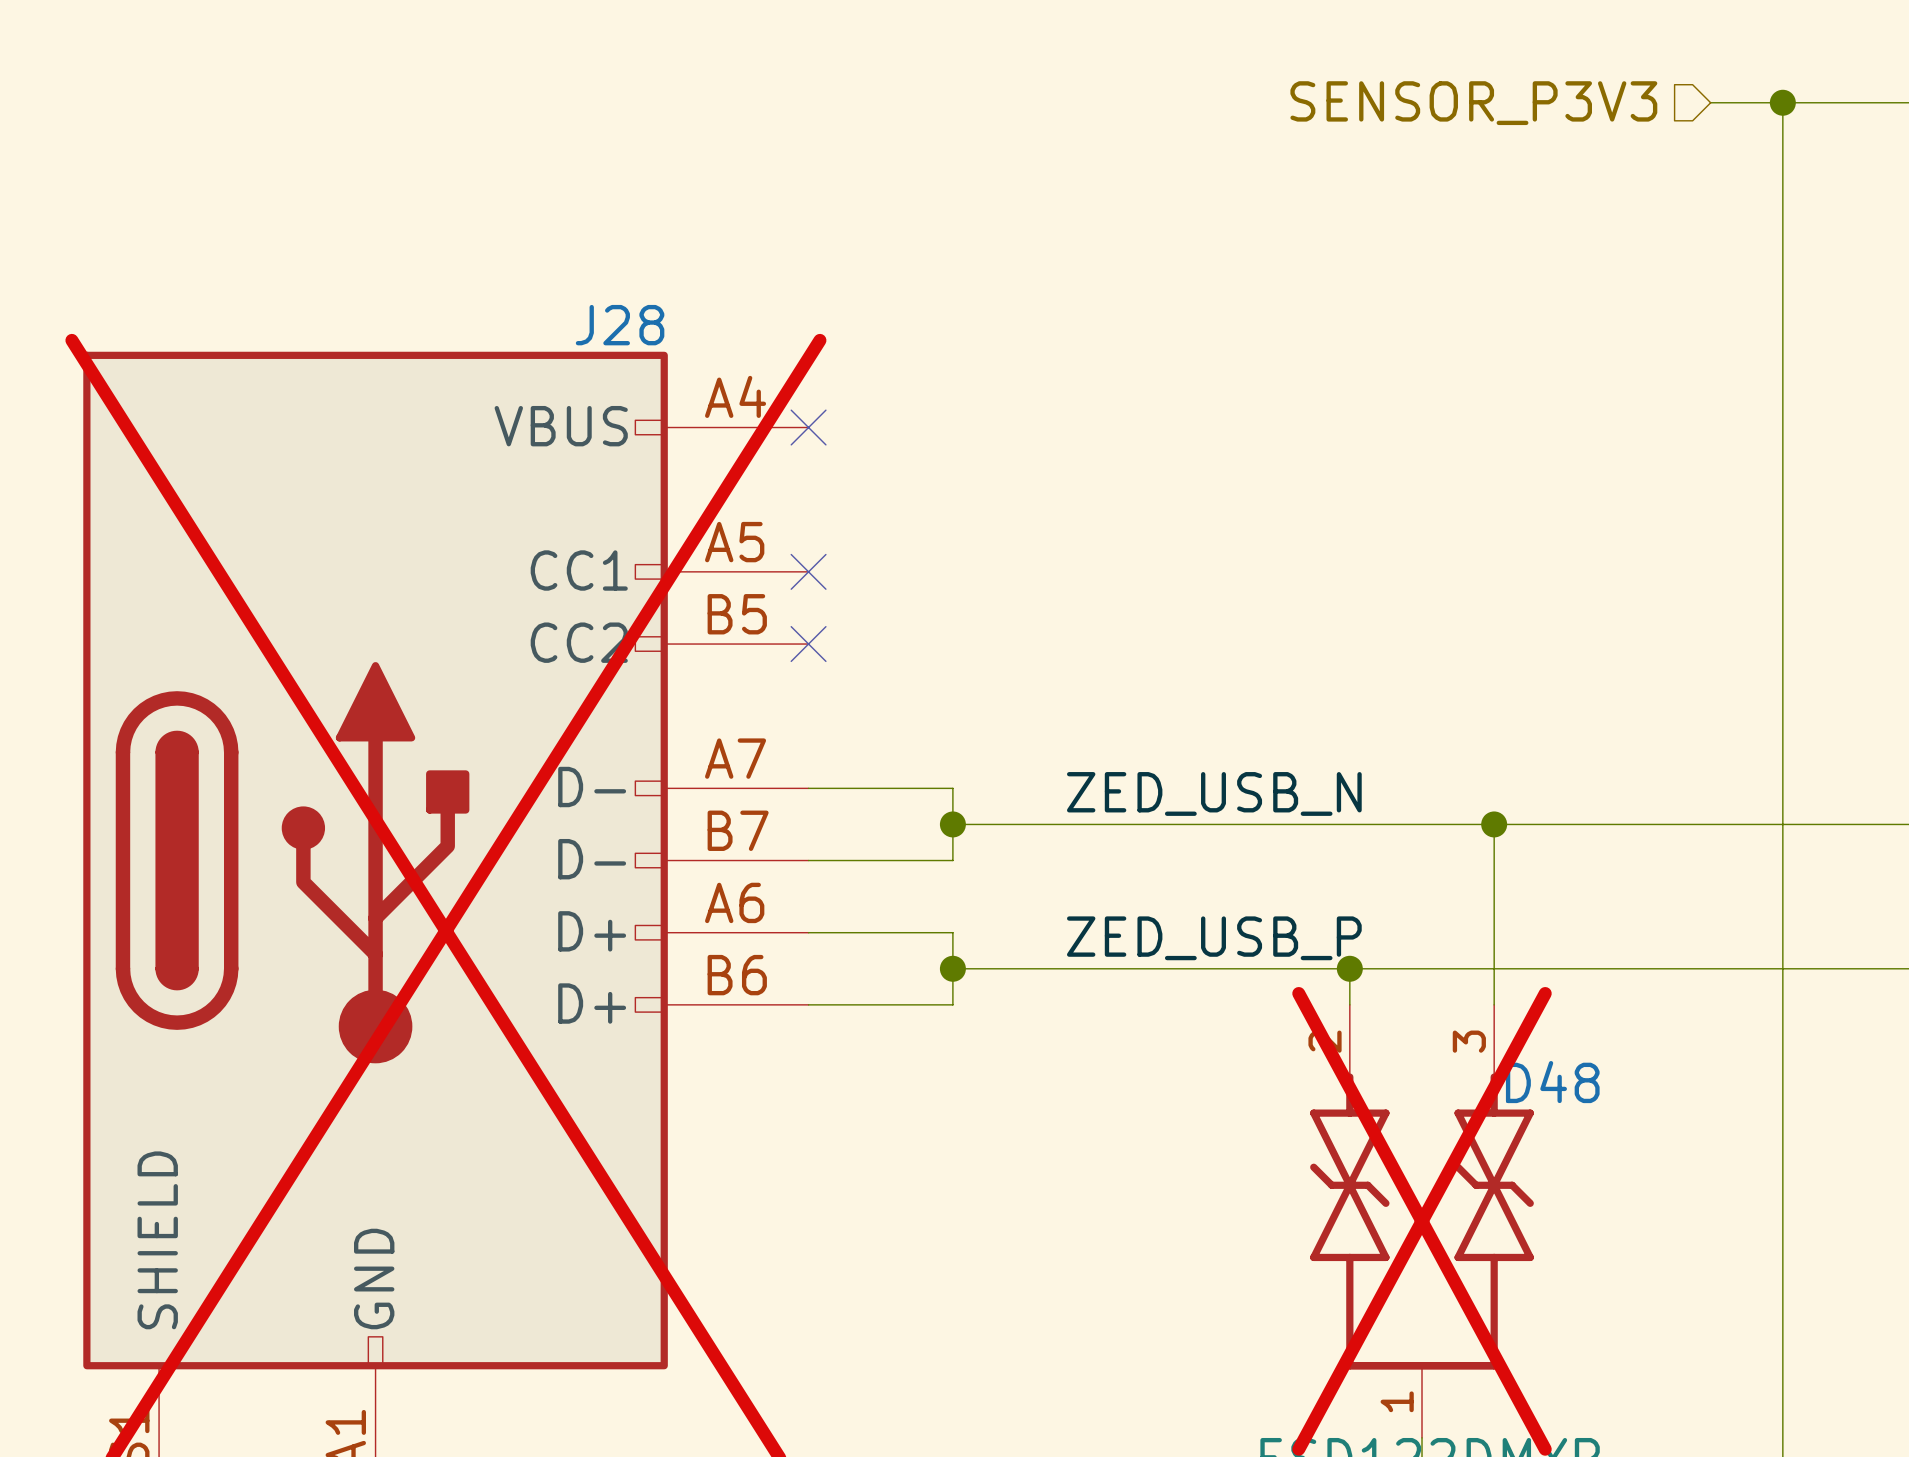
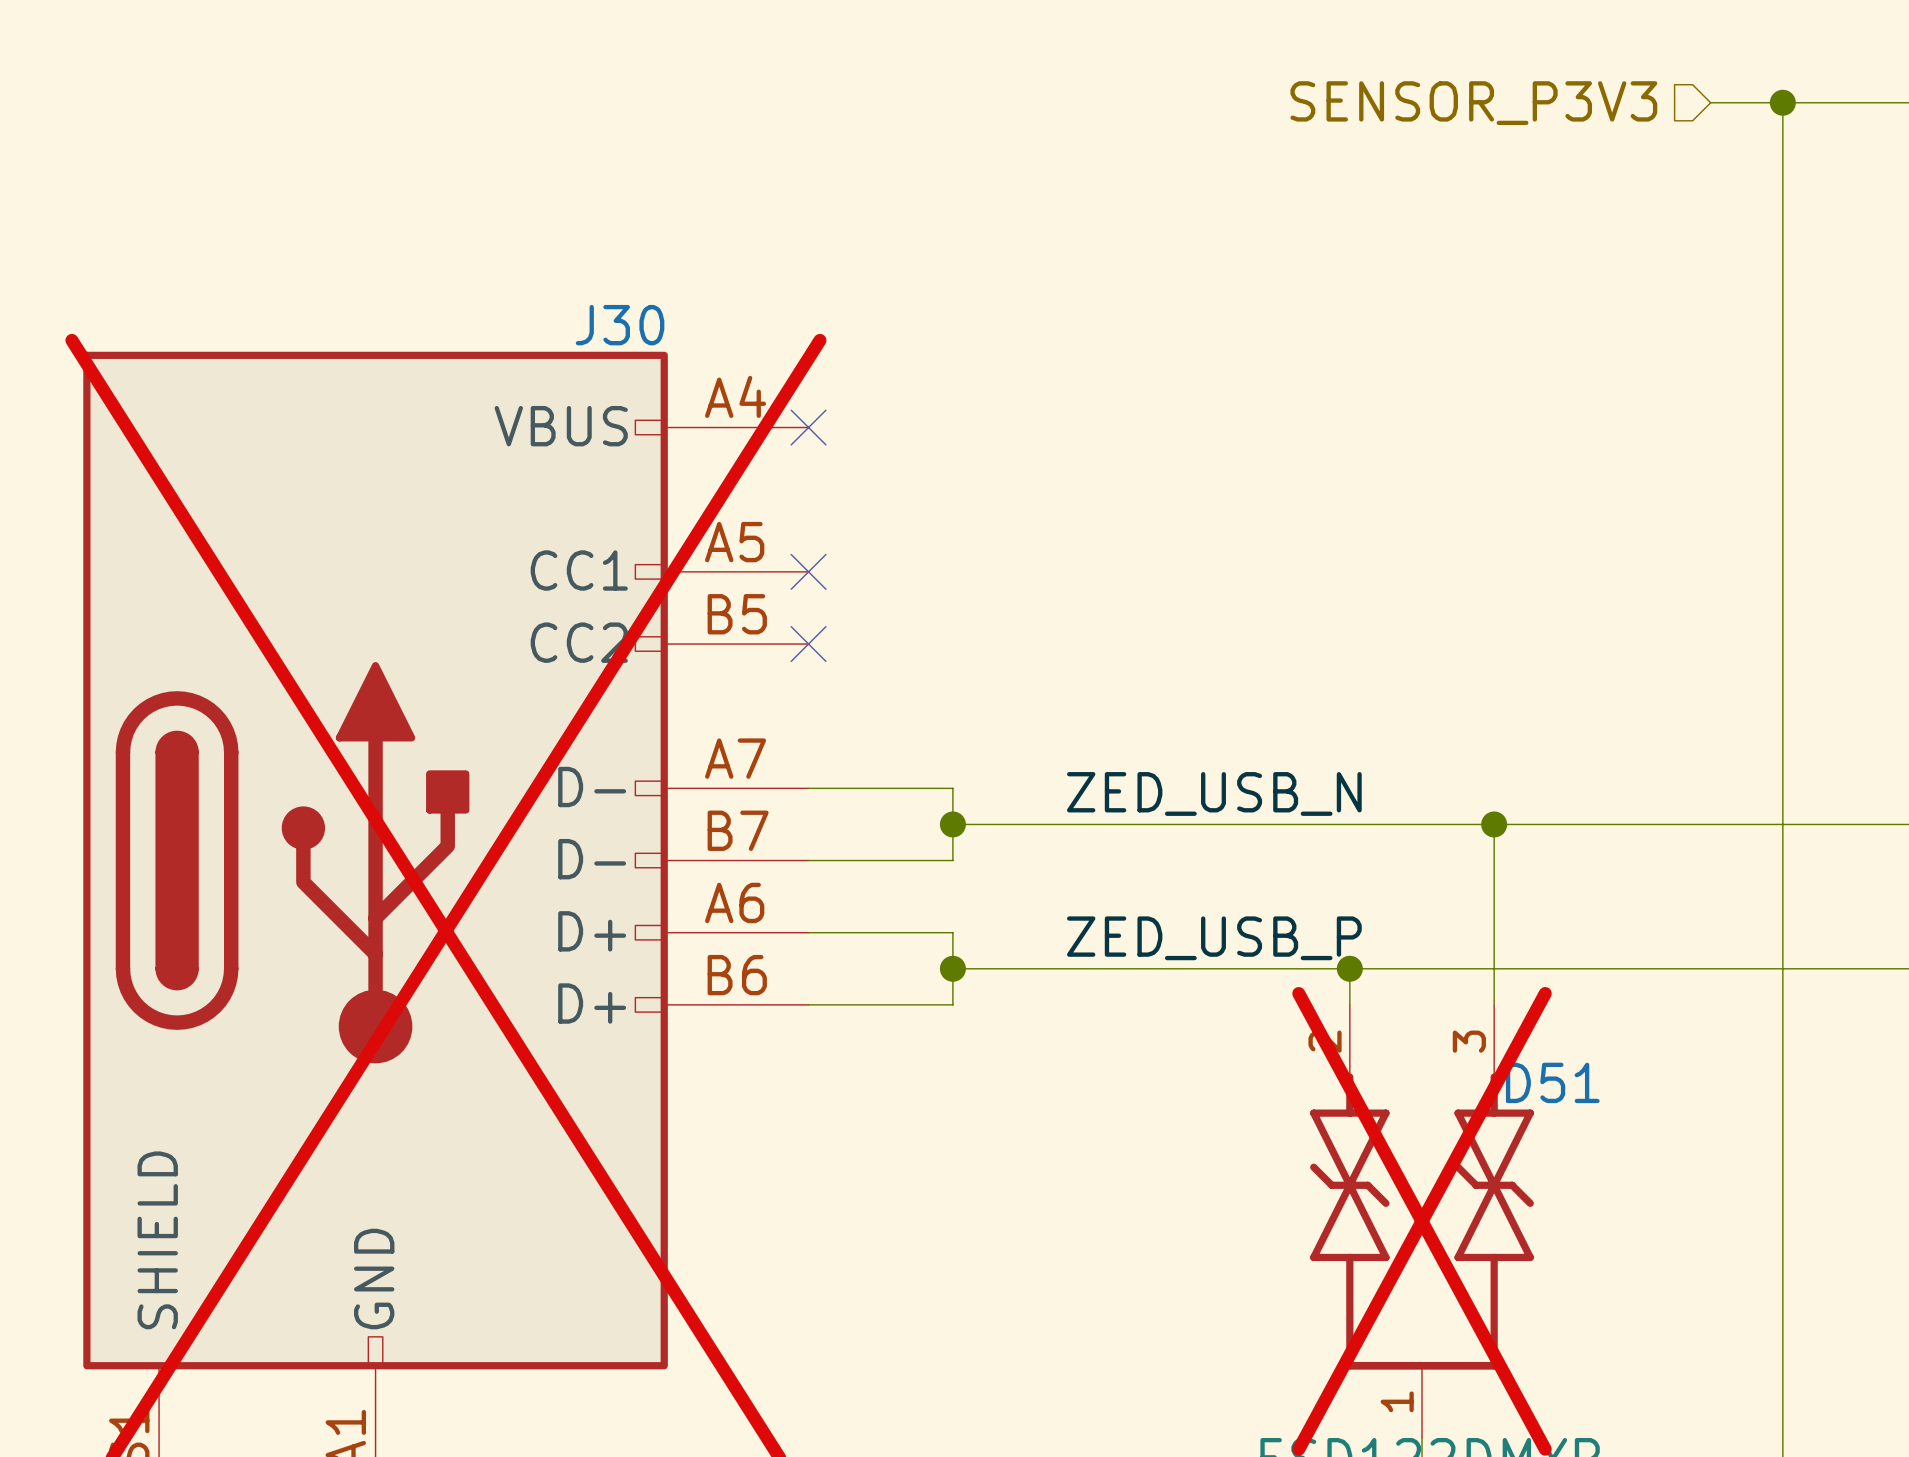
J28 name: J28 (620, 325) -> J30 (620, 325)
D48 name: D48 (1552, 1082) -> D51 (1552, 1082)

